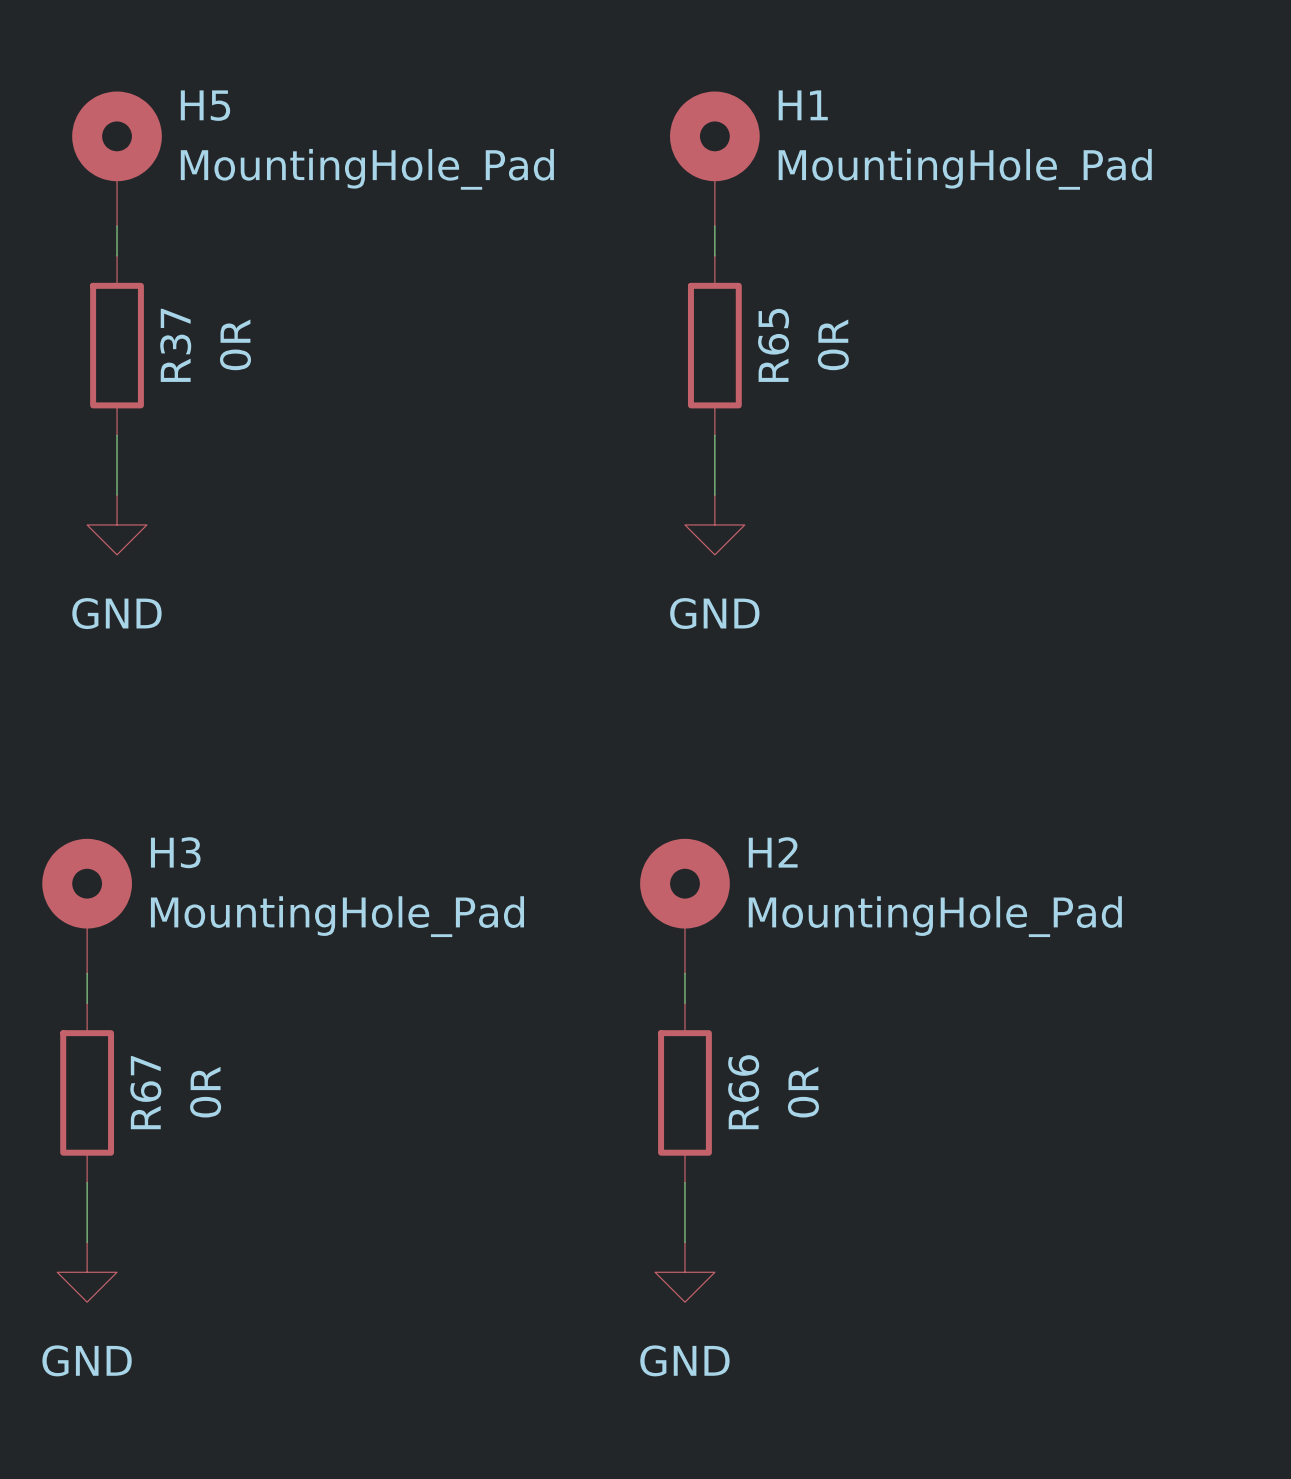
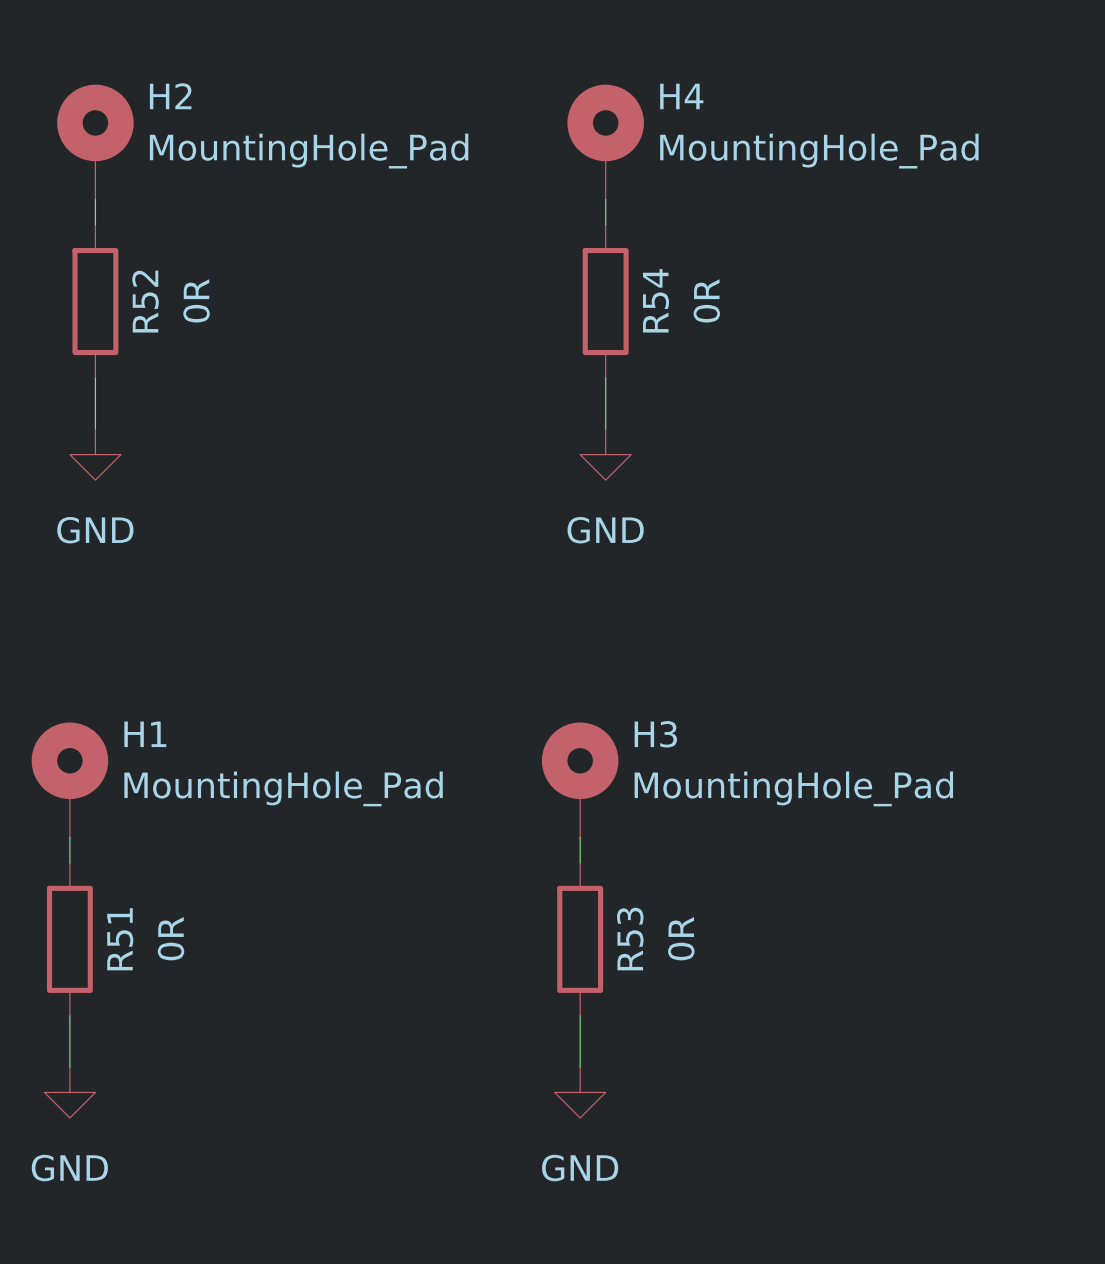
H5 name: H5 (205, 105) -> H2 (170, 96)
H1 name: H1 (803, 105) -> H4 (681, 96)
R37 name: R37 (175, 345) -> R52 (145, 301)
R65 name: R65 (773, 345) -> R54 (656, 300)
H3 name: H3 (175, 852) -> H1 (145, 734)
H2 name: H2 (773, 852) -> H3 (655, 734)
R67 name: R67 (145, 1092) -> R51 (120, 939)
R66 name: R66 (743, 1092) -> R53 (630, 939)

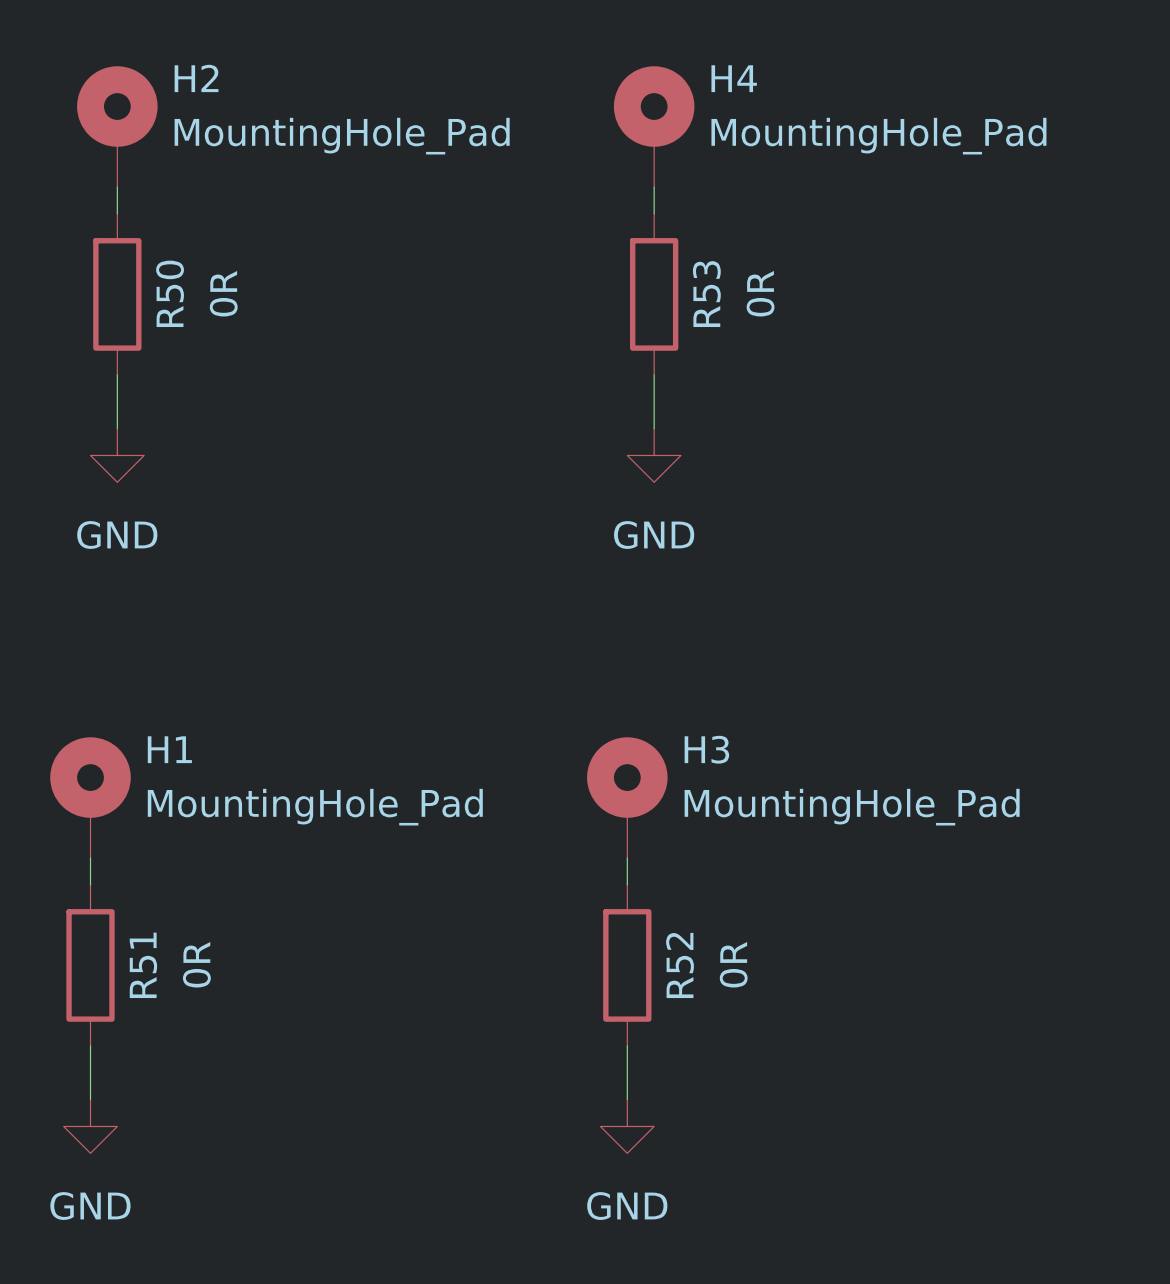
R54 name: R54 (656, 300) -> R53 (706, 294)
R52 name: R52 (145, 301) -> R50 (170, 293)
R53 name: R53 (630, 939) -> R52 (680, 965)

